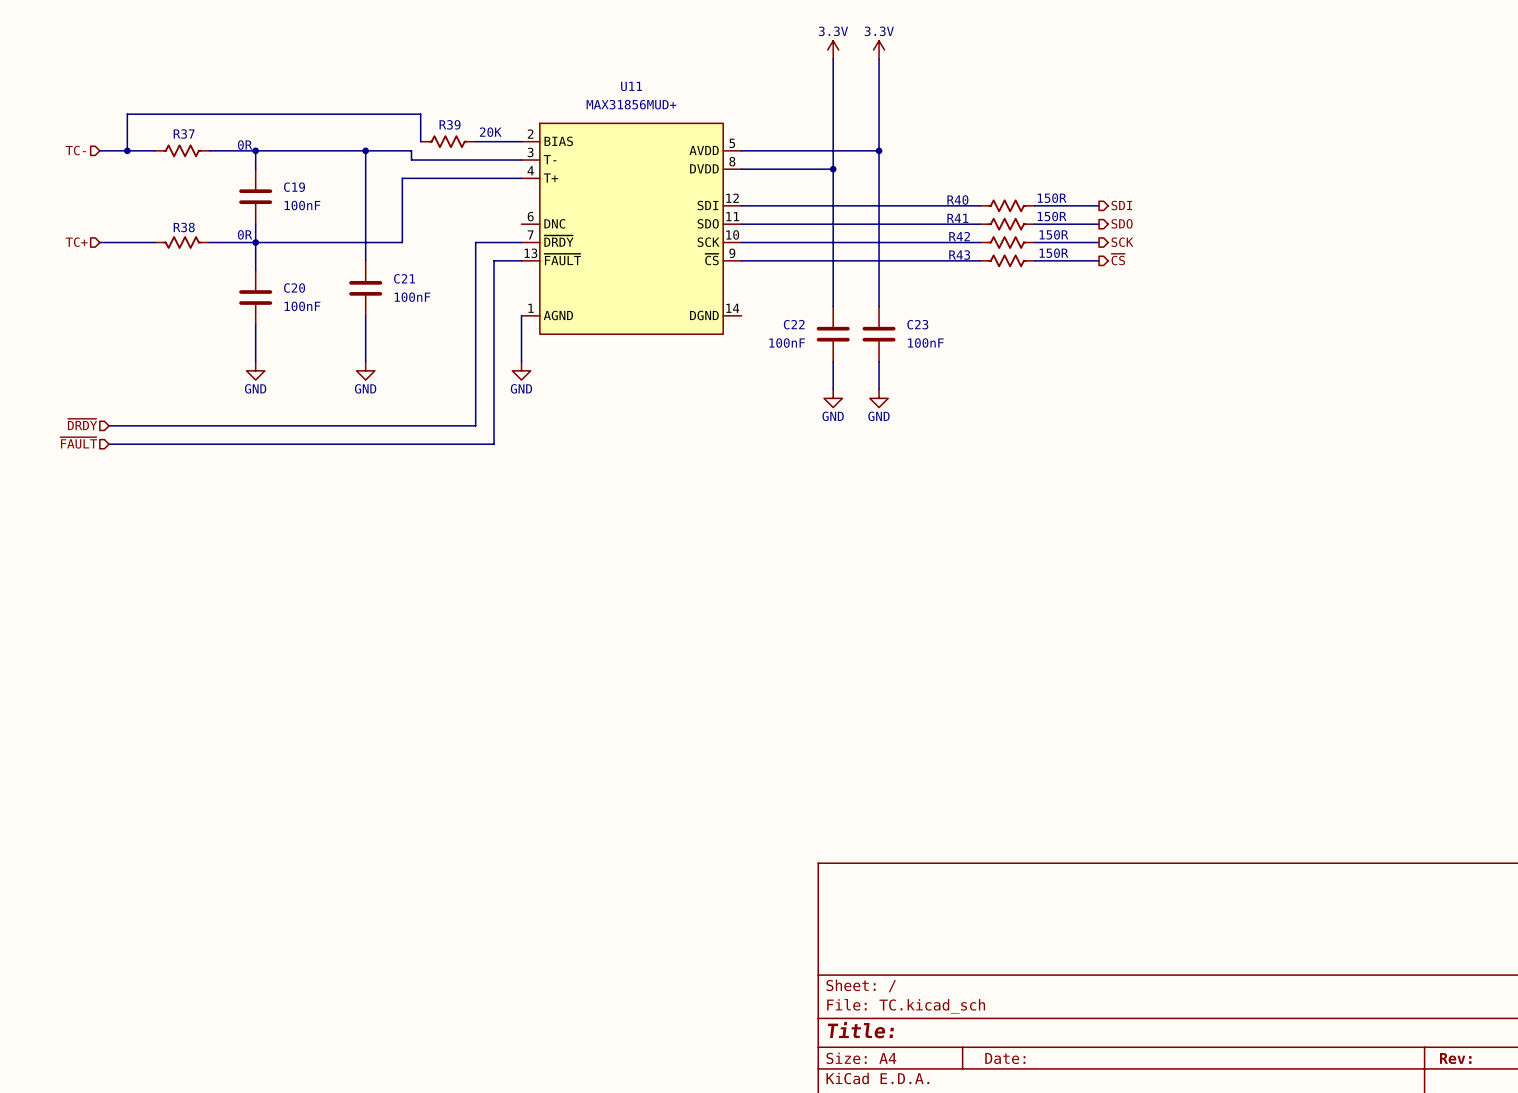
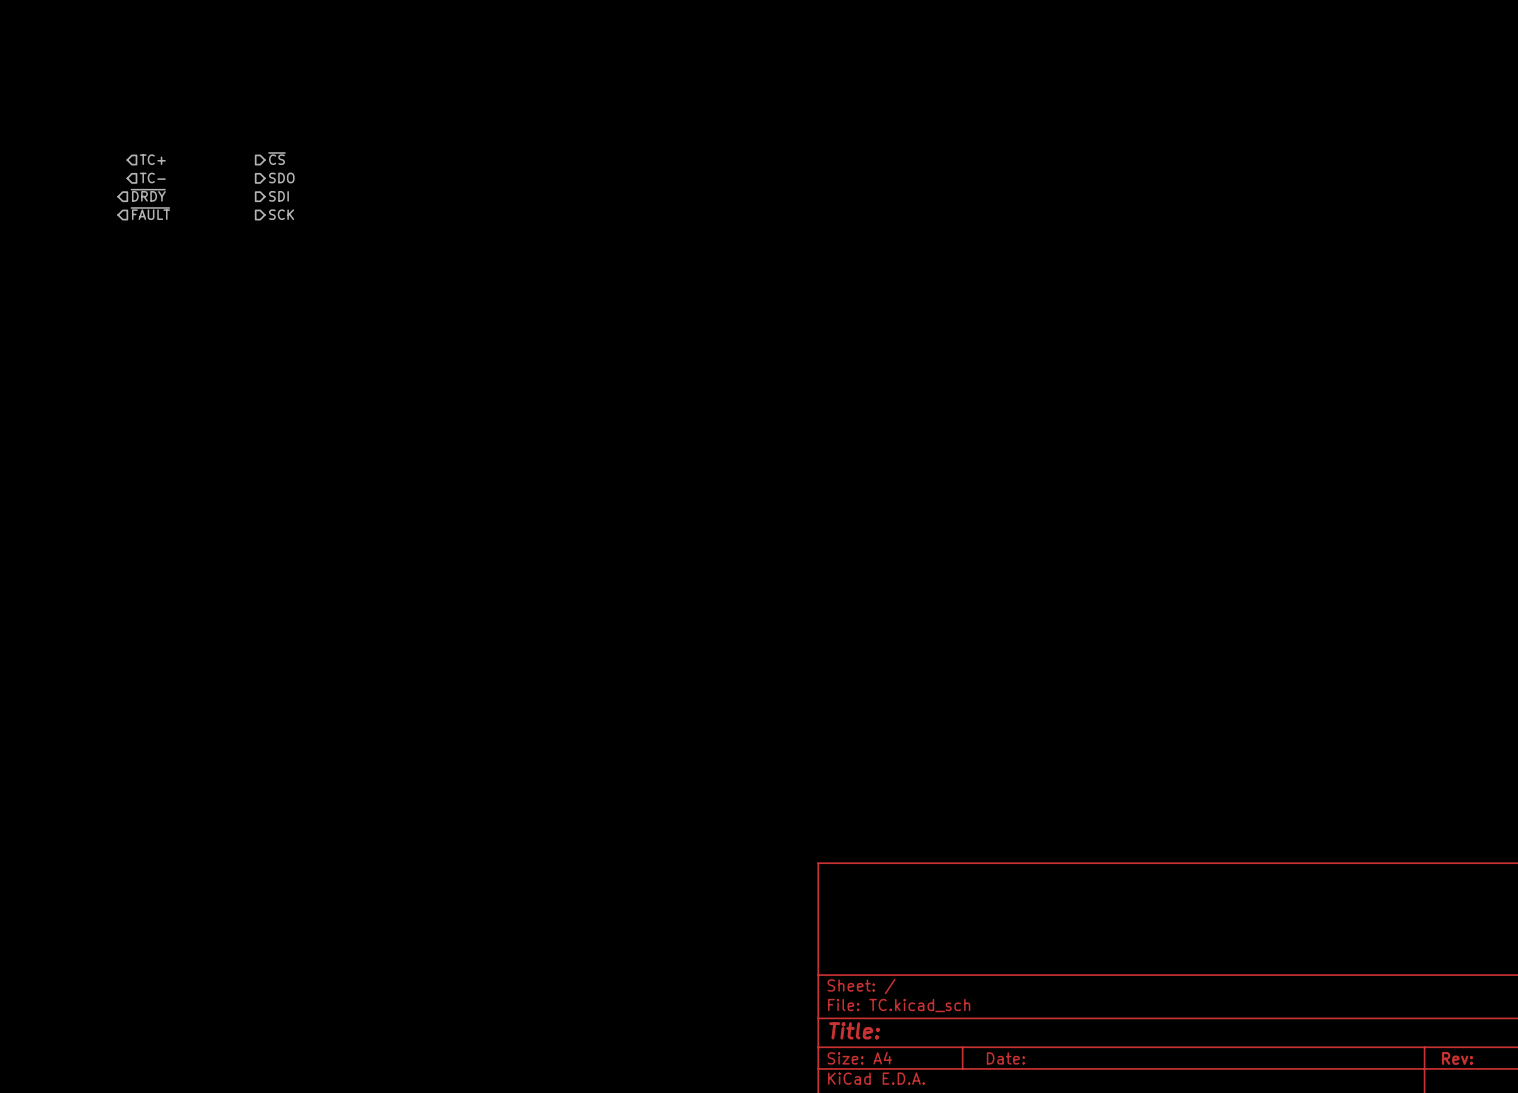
power symbol: 3.3V (833, 50) -> none
power symbol: 3.3V (879, 50) -> none
wire: (833, 59) (833, 306) -> none
wire: (879, 59) (879, 306) -> none
wire: (420, 141) (420, 114) (127, 114) (127, 150) -> none
R39: 20K (448, 141) -> none
wire: (475, 141) (521, 141) -> none
hierarchical label rotation: 0° (75, 150) -> 180° (152, 178)
hierarchical label position: TC- (75, 150) -> TC- (152, 178)
wire: (99, 150) (154, 150) -> none
junction: (127, 150) -> none
R37: 0R (182, 150) -> none
wire: (209, 150) (411, 150) (411, 160) (521, 160) -> none
junction: (255, 150) -> none
wire: (365, 150) (365, 260) -> none
junction: (365, 150) -> none
wire: (741, 150) (879, 150) -> none
junction: (879, 150) -> none
hierarchical label: none -> ~{CS} (276, 158)
wire: (741, 169) (833, 169) -> none
junction: (833, 169) -> none
hierarchical label: none -> SDO (281, 178)
wire: (521, 178) (402, 178) (402, 242) (209, 242) -> none
hierarchical label: none -> ~{DRDY} (148, 195)
C19: 100nF (255, 196) -> none
hierarchical label: none -> SDI (278, 196)
wire: (741, 205) (979, 205) -> none
R40: 150R (1007, 205) -> none
wire: (1034, 205) (1099, 205) -> none
hierarchical label: SDI (1121, 205) -> none
hierarchical label: none -> ~{FAULT} (150, 213)
hierarchical label: none -> SCK (281, 214)
hierarchical label: SDO (1122, 223) -> none
wire: (255, 224) (255, 270) -> none
wire: (741, 224) (979, 224) -> none
R41: 150R (1007, 224) -> none
wire: (1034, 224) (1099, 224) -> none
U11: MAX31856MUD+ (631, 228) -> none
hierarchical label rotation: 0° (76, 242) -> 180° (152, 159)
hierarchical label position: TC+ (76, 242) -> TC+ (152, 159)
wire: (99, 242) (154, 242) -> none
R38: 0R (182, 242) -> none
junction: (255, 242) -> none
wire: (521, 242) (475, 242) (475, 425) (109, 425) -> none
wire: (741, 242) (979, 242) -> none
R42: 150R (1007, 242) -> none
wire: (1034, 242) (1099, 242) -> none
hierarchical label: SCK (1122, 242) -> none
hierarchical label: ~{CS} (1118, 259) -> none
wire: (521, 260) (494, 260) (494, 444) (109, 444) -> none
wire: (741, 260) (979, 260) -> none
R43: 150R (1007, 260) -> none
wire: (1034, 260) (1099, 260) -> none
C21: 100nF (365, 288) -> none
C20: 100nF (255, 297) -> none
wire: (365, 315) (365, 361) -> none
wire: (521, 315) (521, 361) -> none
wire: (255, 325) (255, 361) -> none
C22: 100nF (833, 334) -> none
C23: 100nF (879, 334) -> none
wire: (833, 361) (833, 389) -> none
wire: (879, 361) (879, 389) -> none
power symbol: GND (255, 370) -> none
power symbol: GND (365, 370) -> none
power symbol: GND (521, 370) -> none
power symbol: GND (833, 398) -> none
power symbol: GND (879, 398) -> none
hierarchical label: ~{DRDY} (82, 424) -> none
hierarchical label: ~{FAULT} (78, 442) -> none

